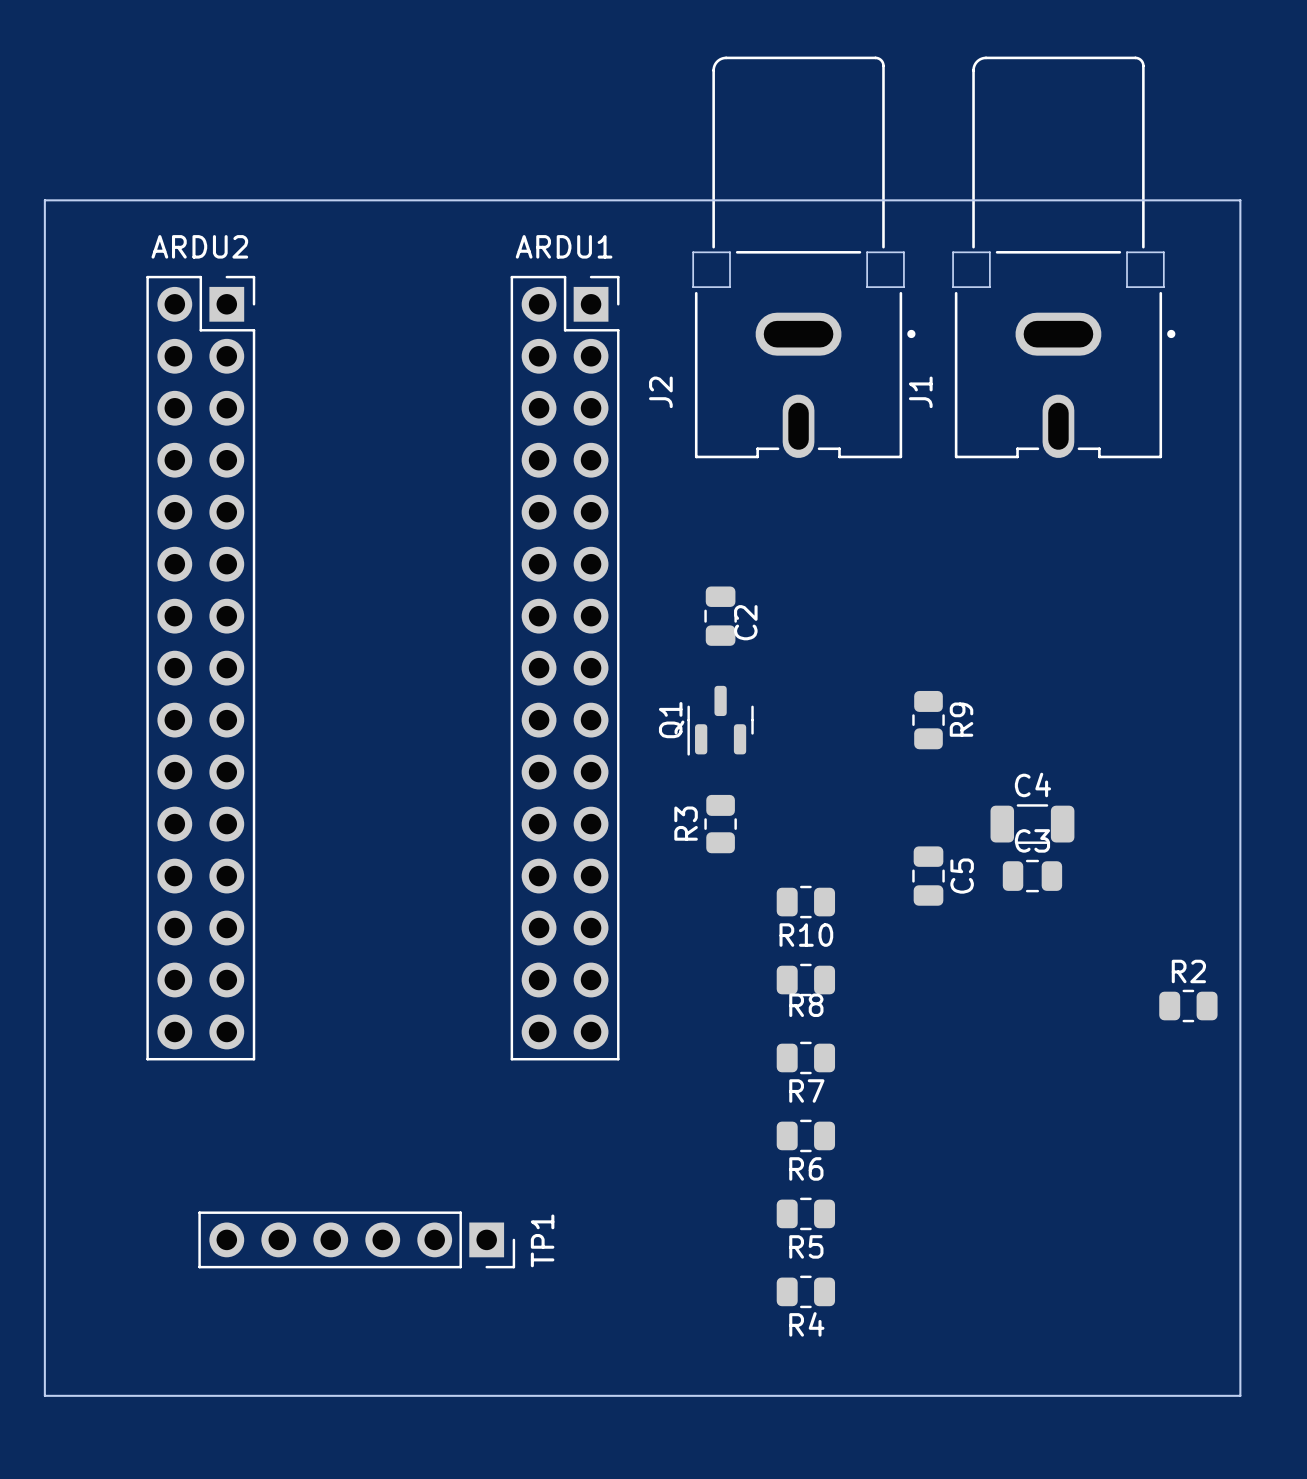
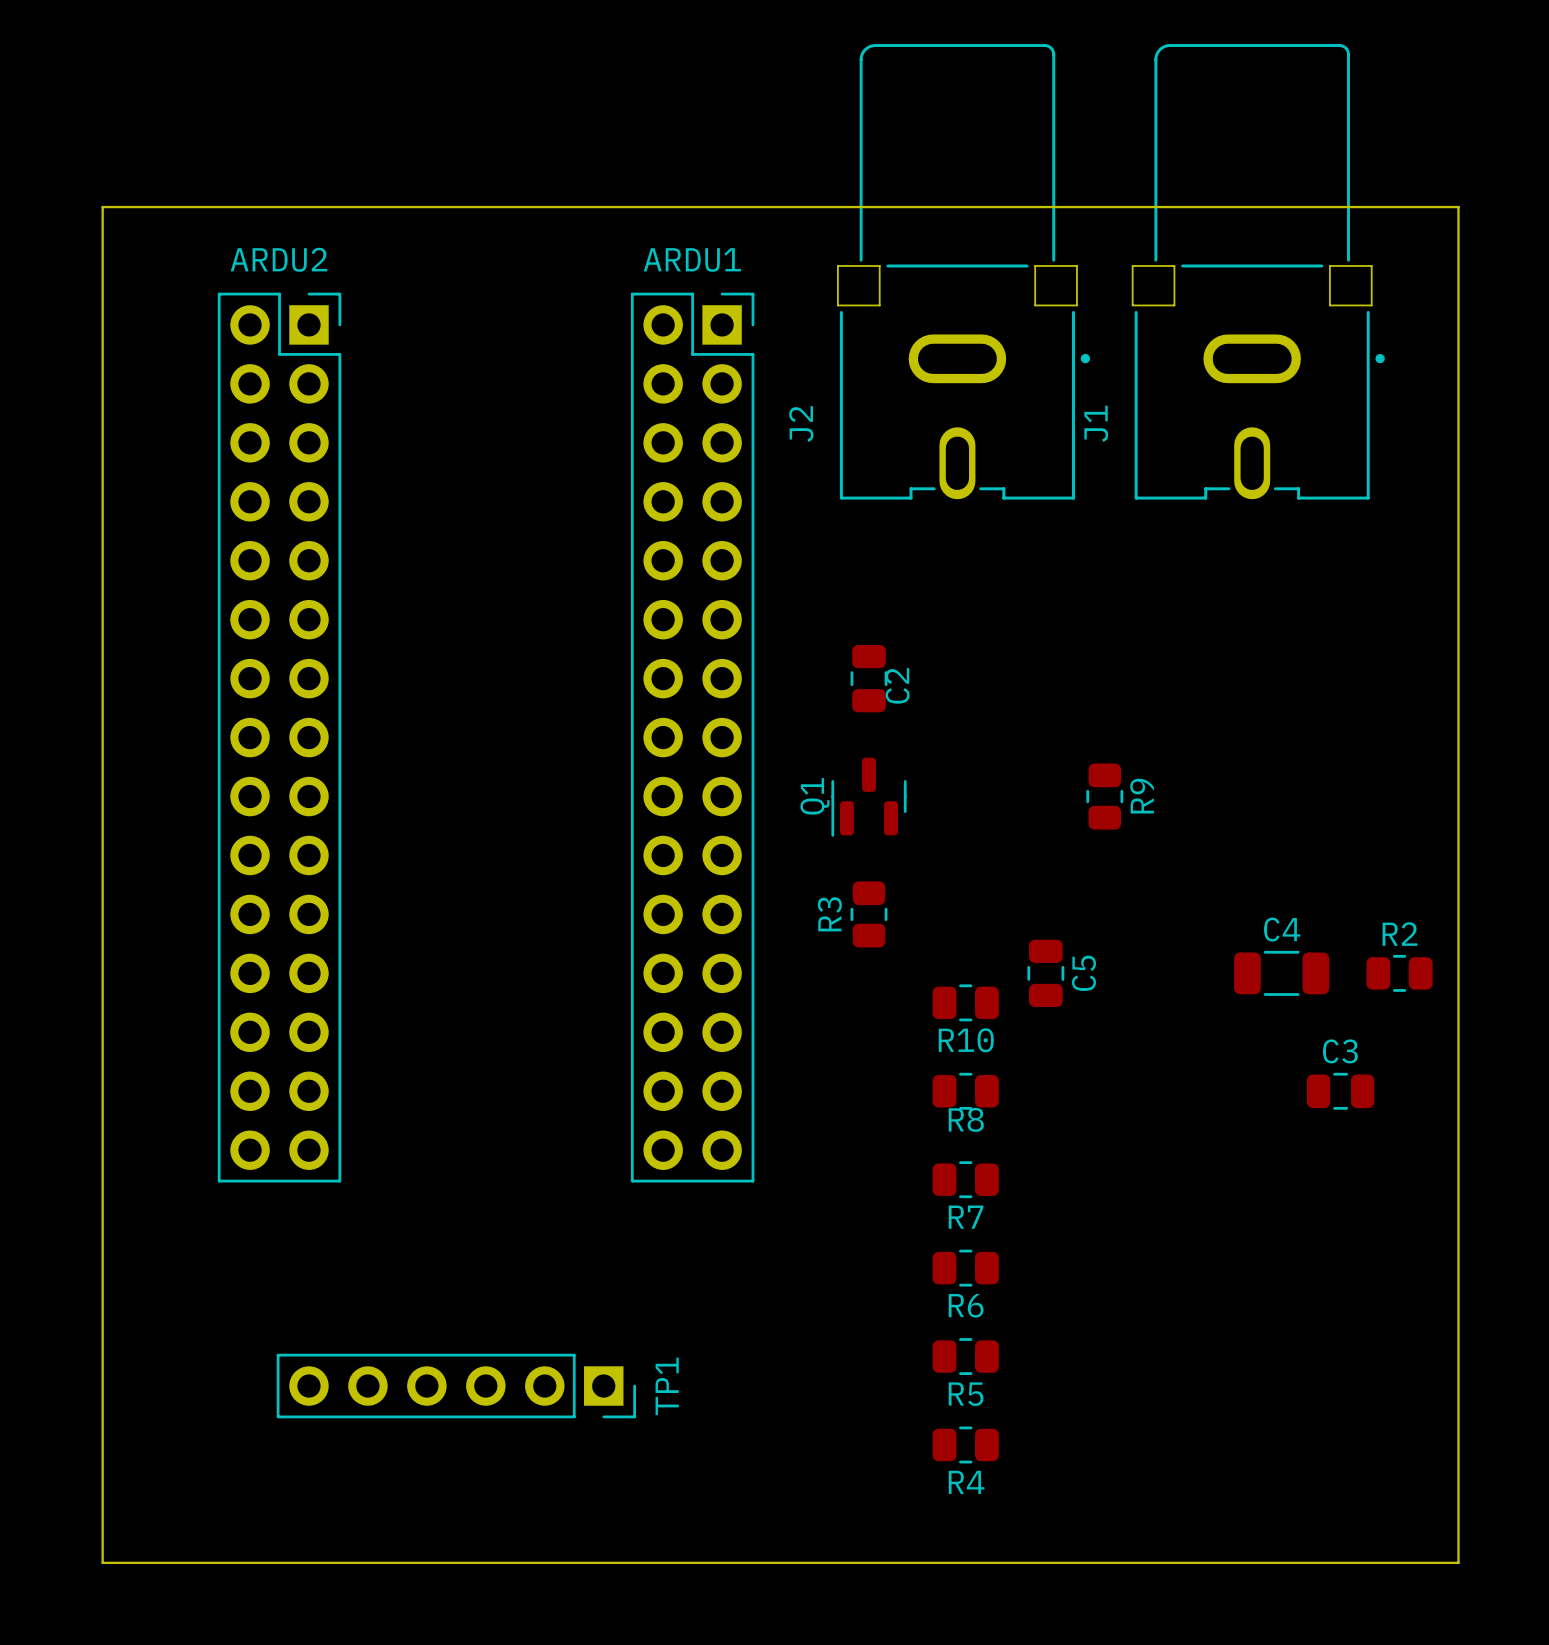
C4 position: (1032, 824) -> (1281, 973)
C5 position: (928, 876) -> (1045, 973)
C3 position: (1032, 876) -> (1340, 1091)
R2 position: (1188, 1006) -> (1399, 973)

